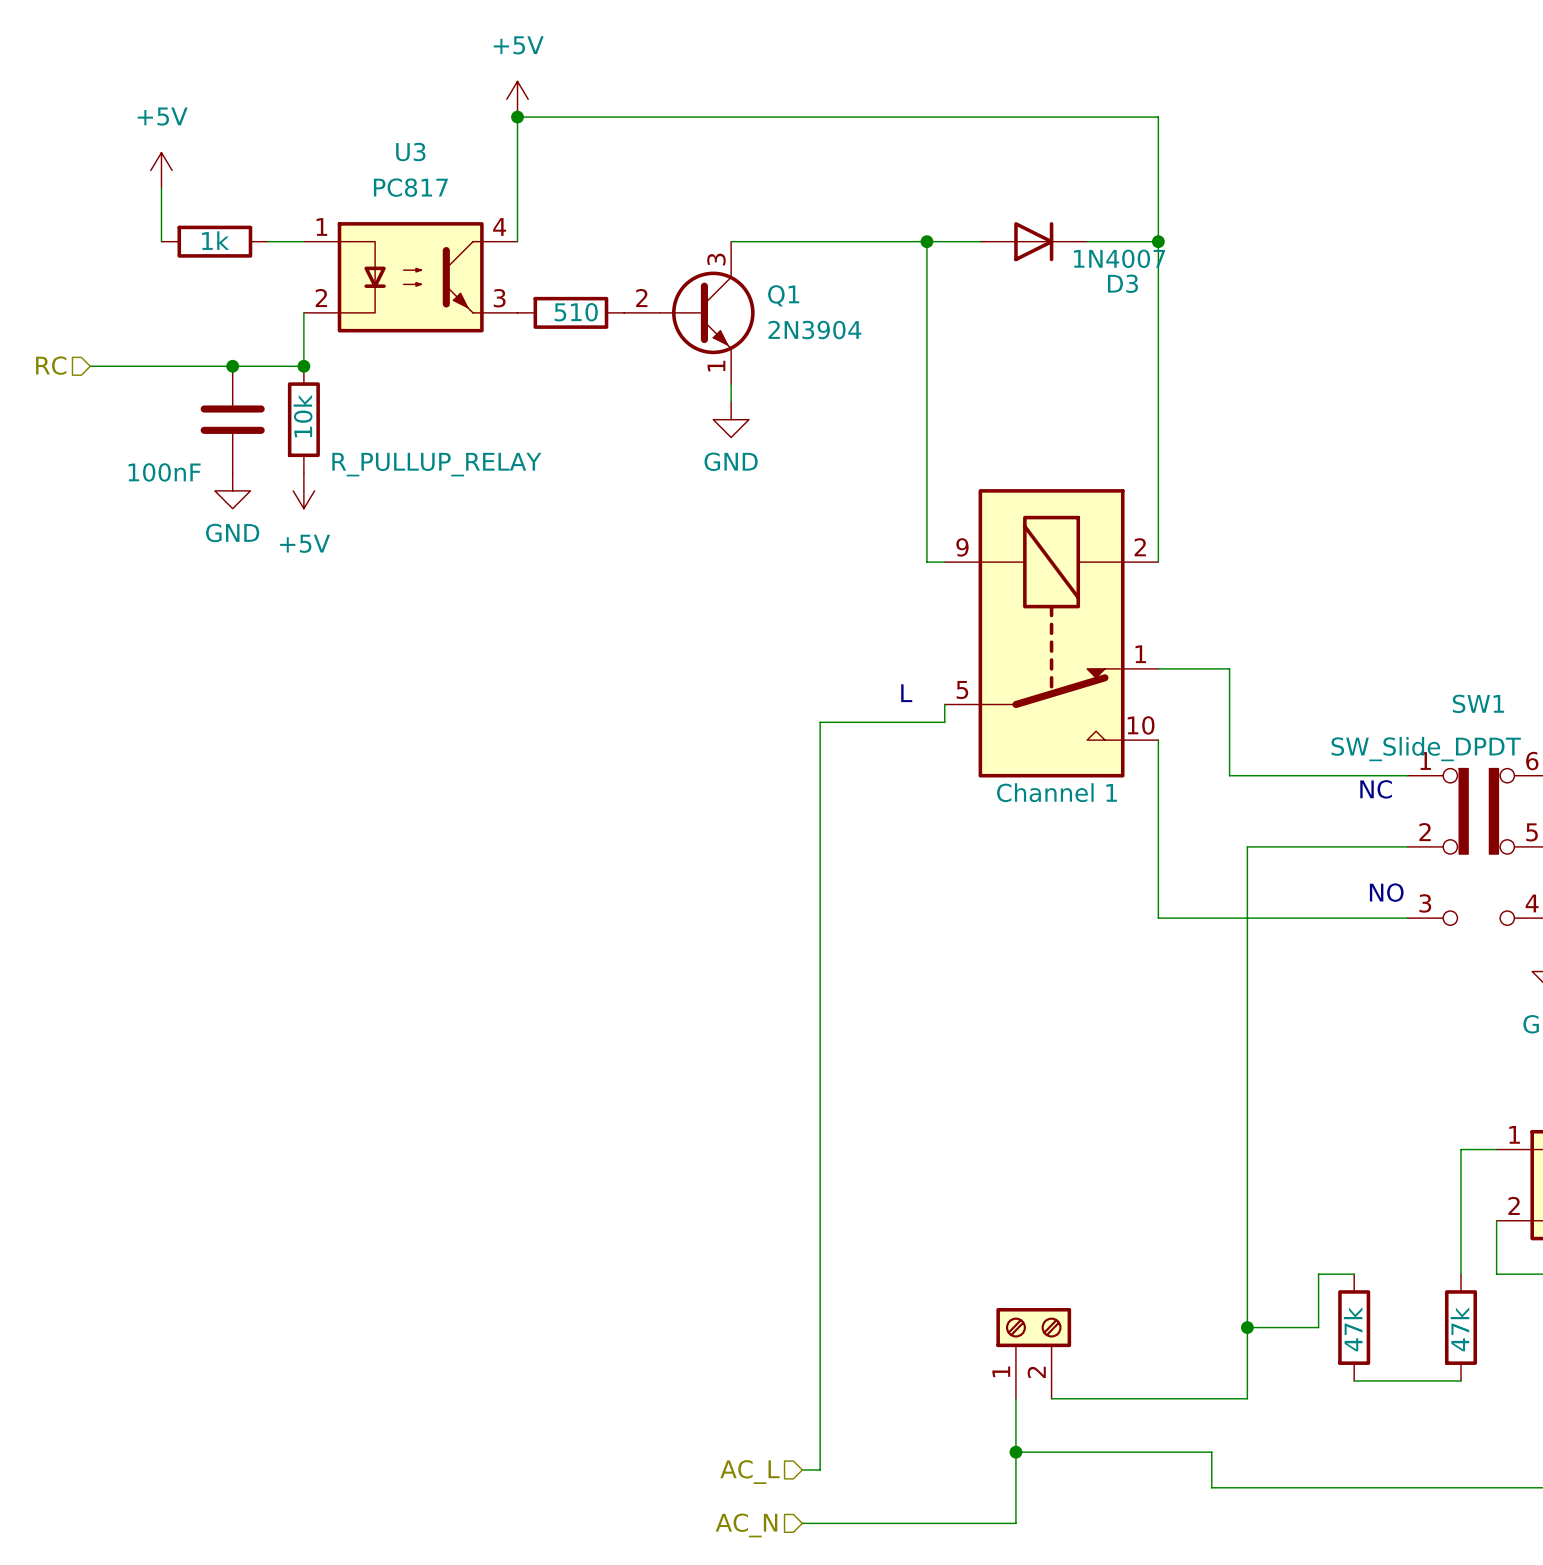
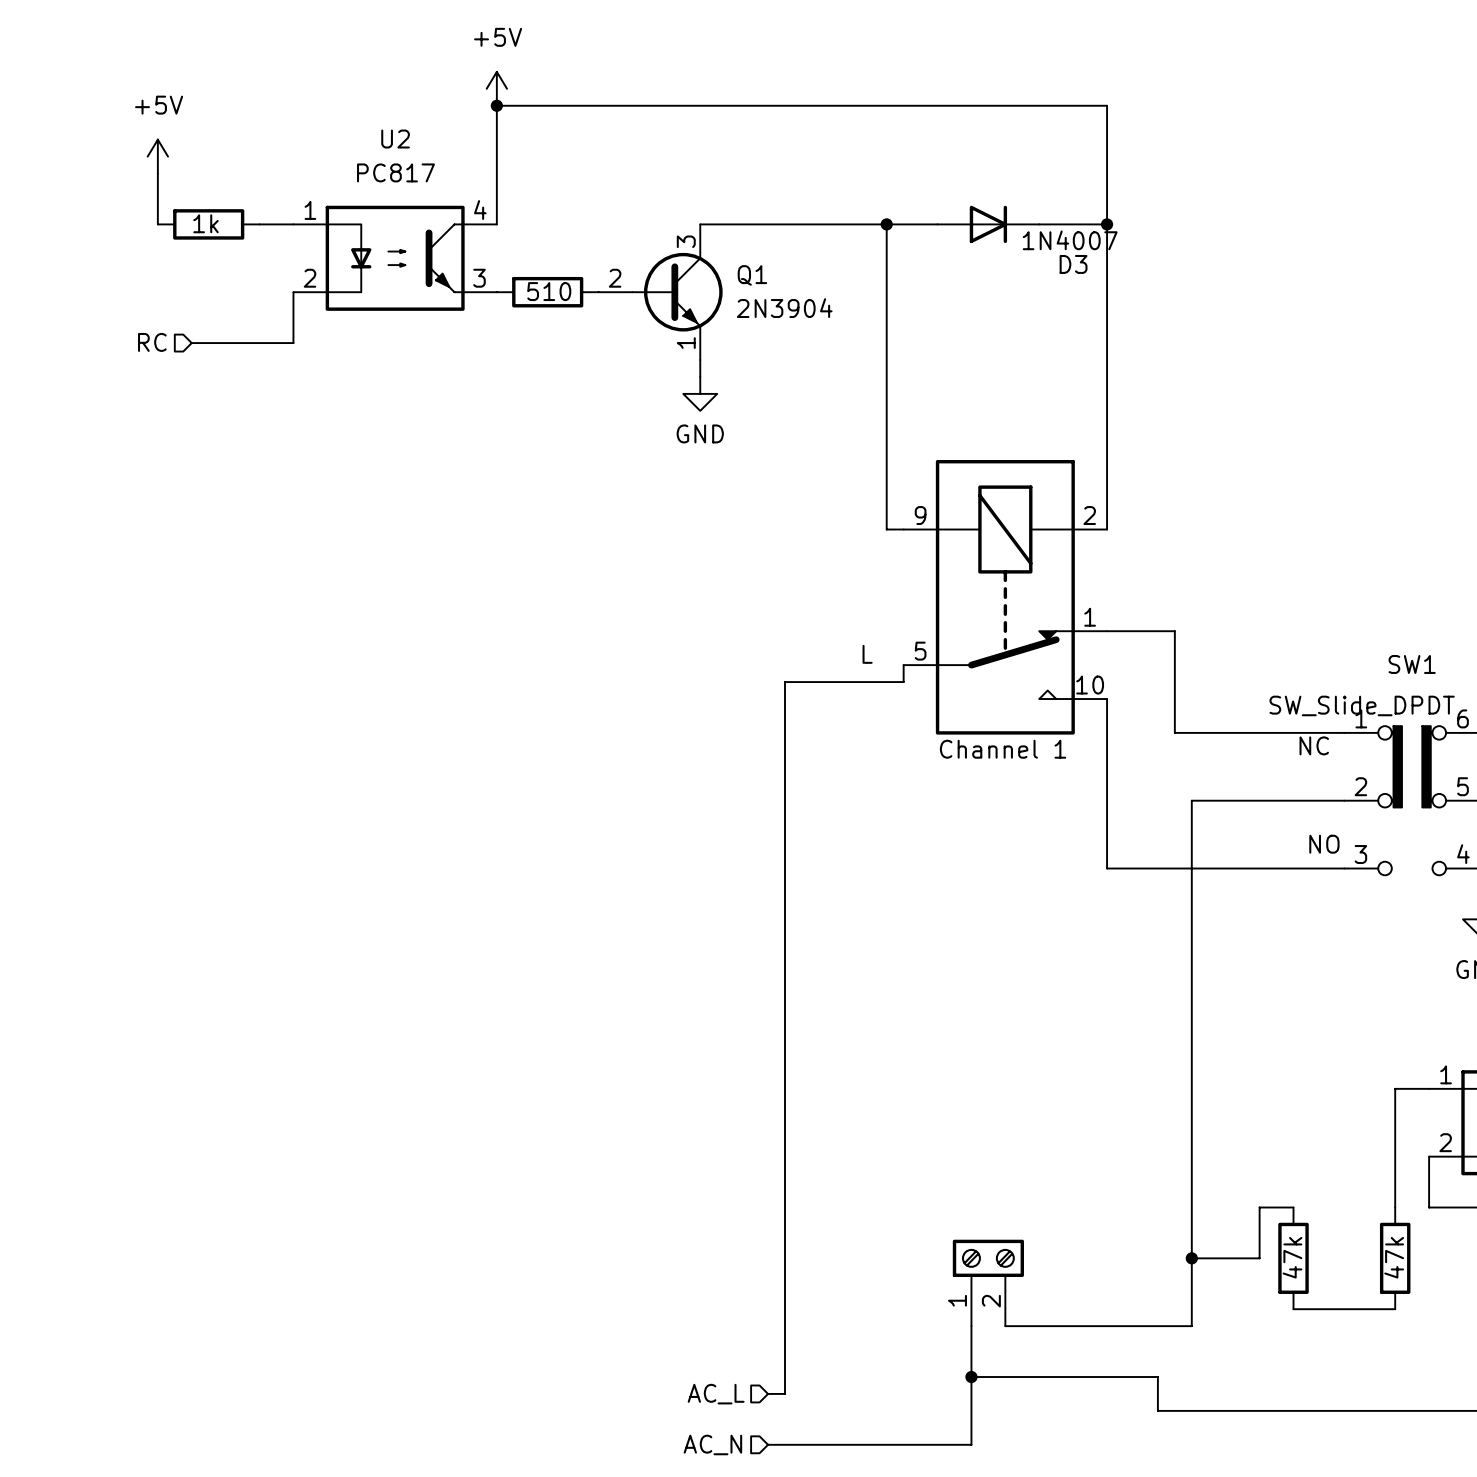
U3 name: U3 (410, 152) -> U2 (395, 139)
hierarchical label position: RC (51, 365) -> RC (152, 342)
wire: (90, 366) (197, 366) -> none
junction: (232, 366) -> none
junction: (303, 366) -> none
part: 100nF (232, 419) -> none
part: 10k (303, 419) -> none
power symbol: GND (232, 490) -> none
power symbol: +5V (303, 490) -> none

